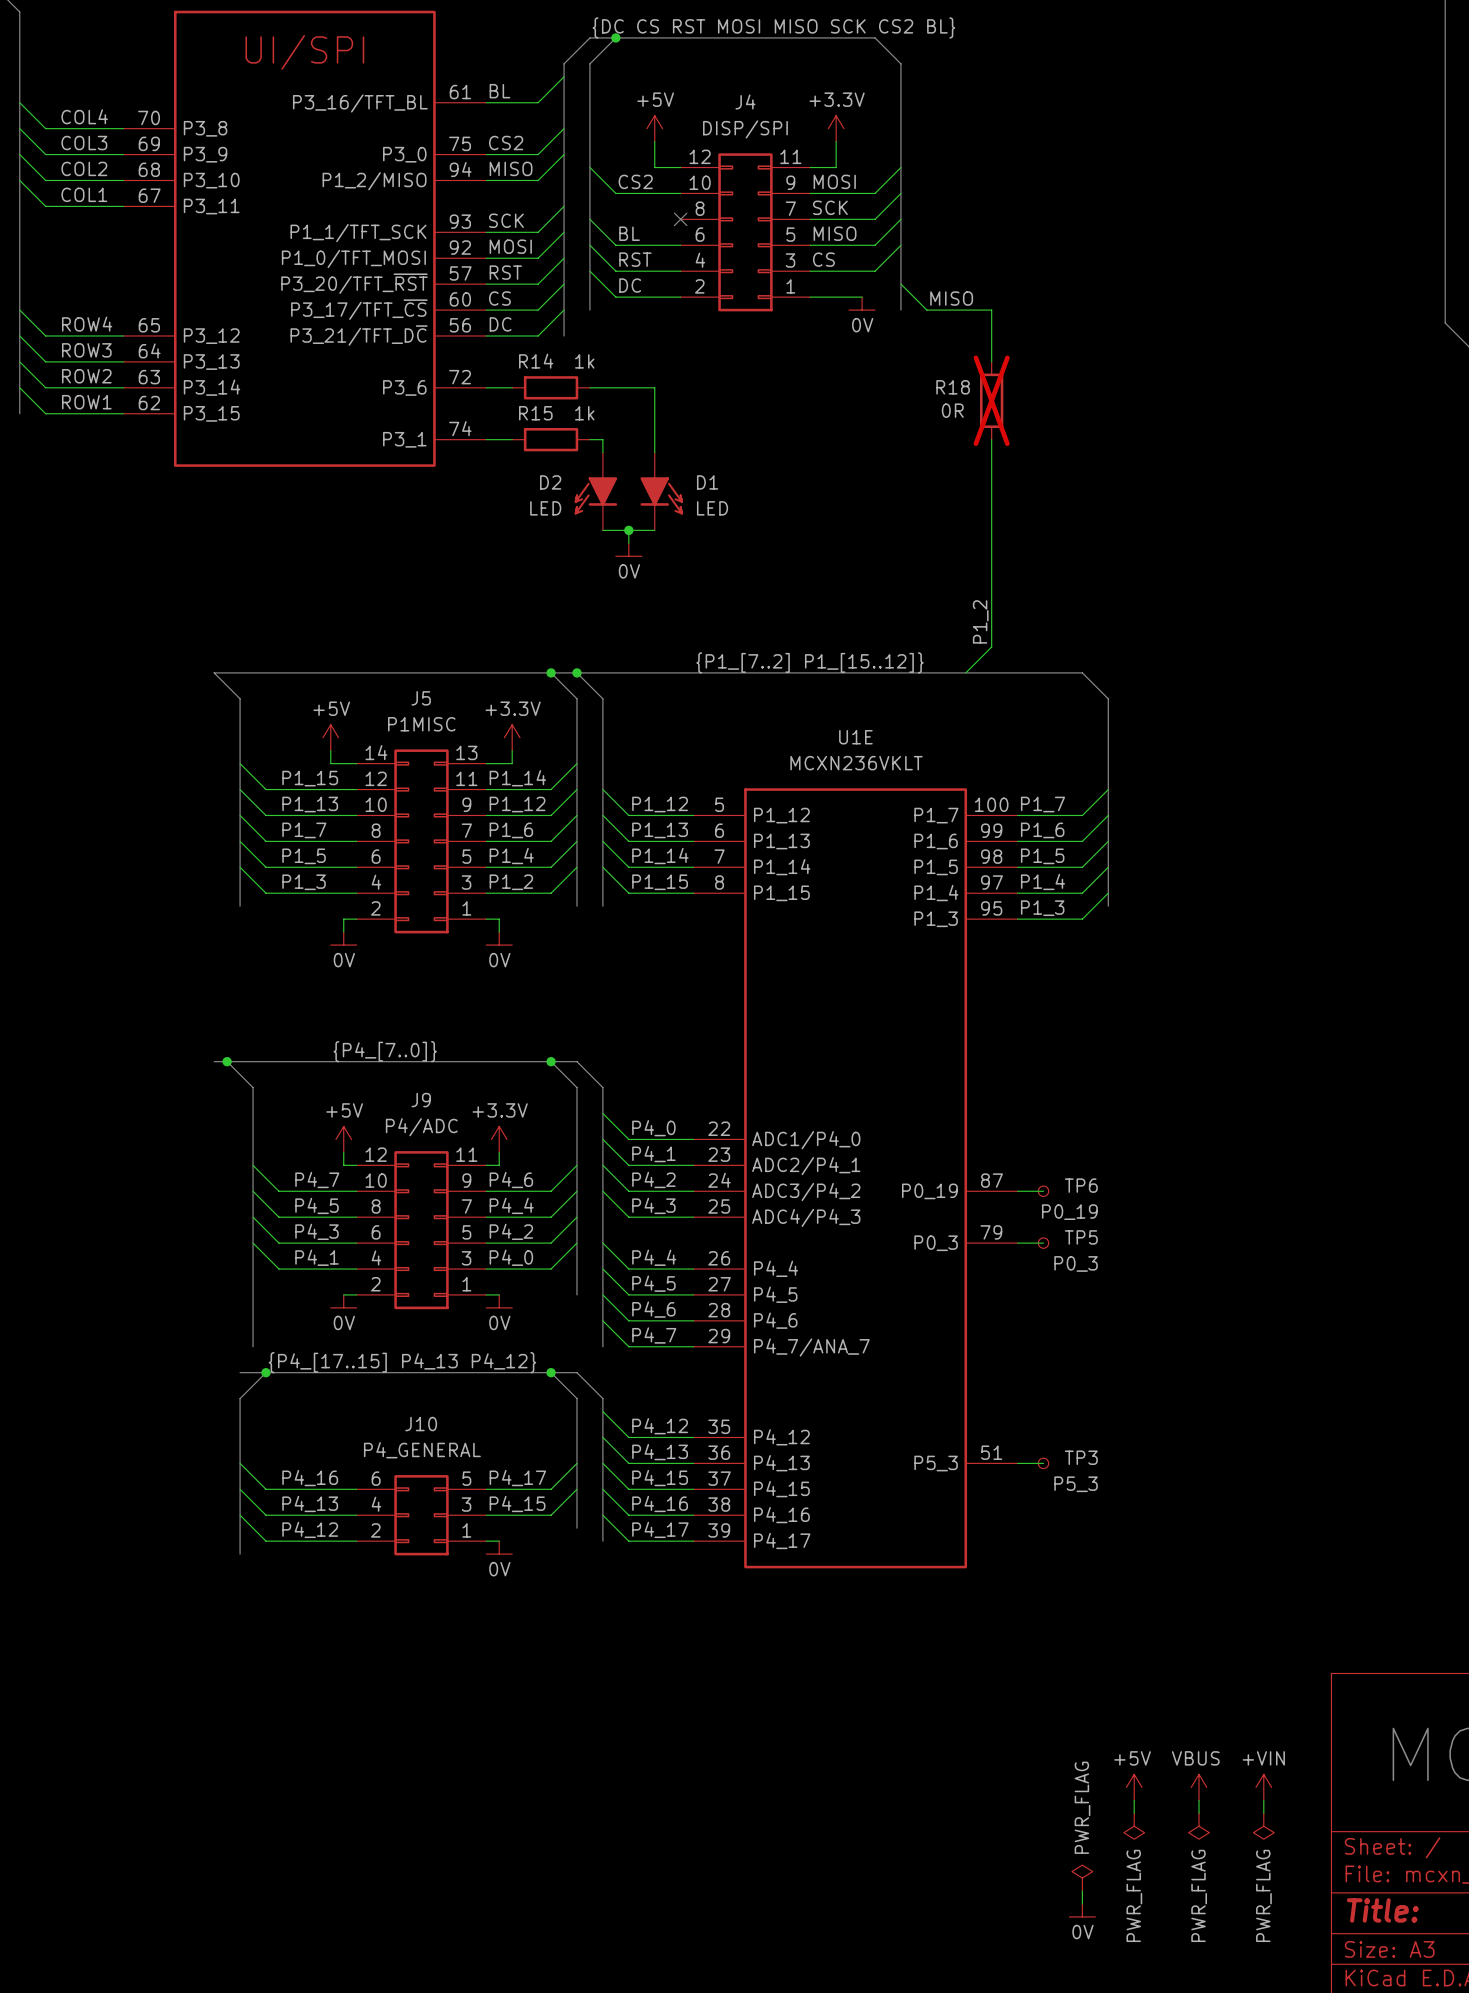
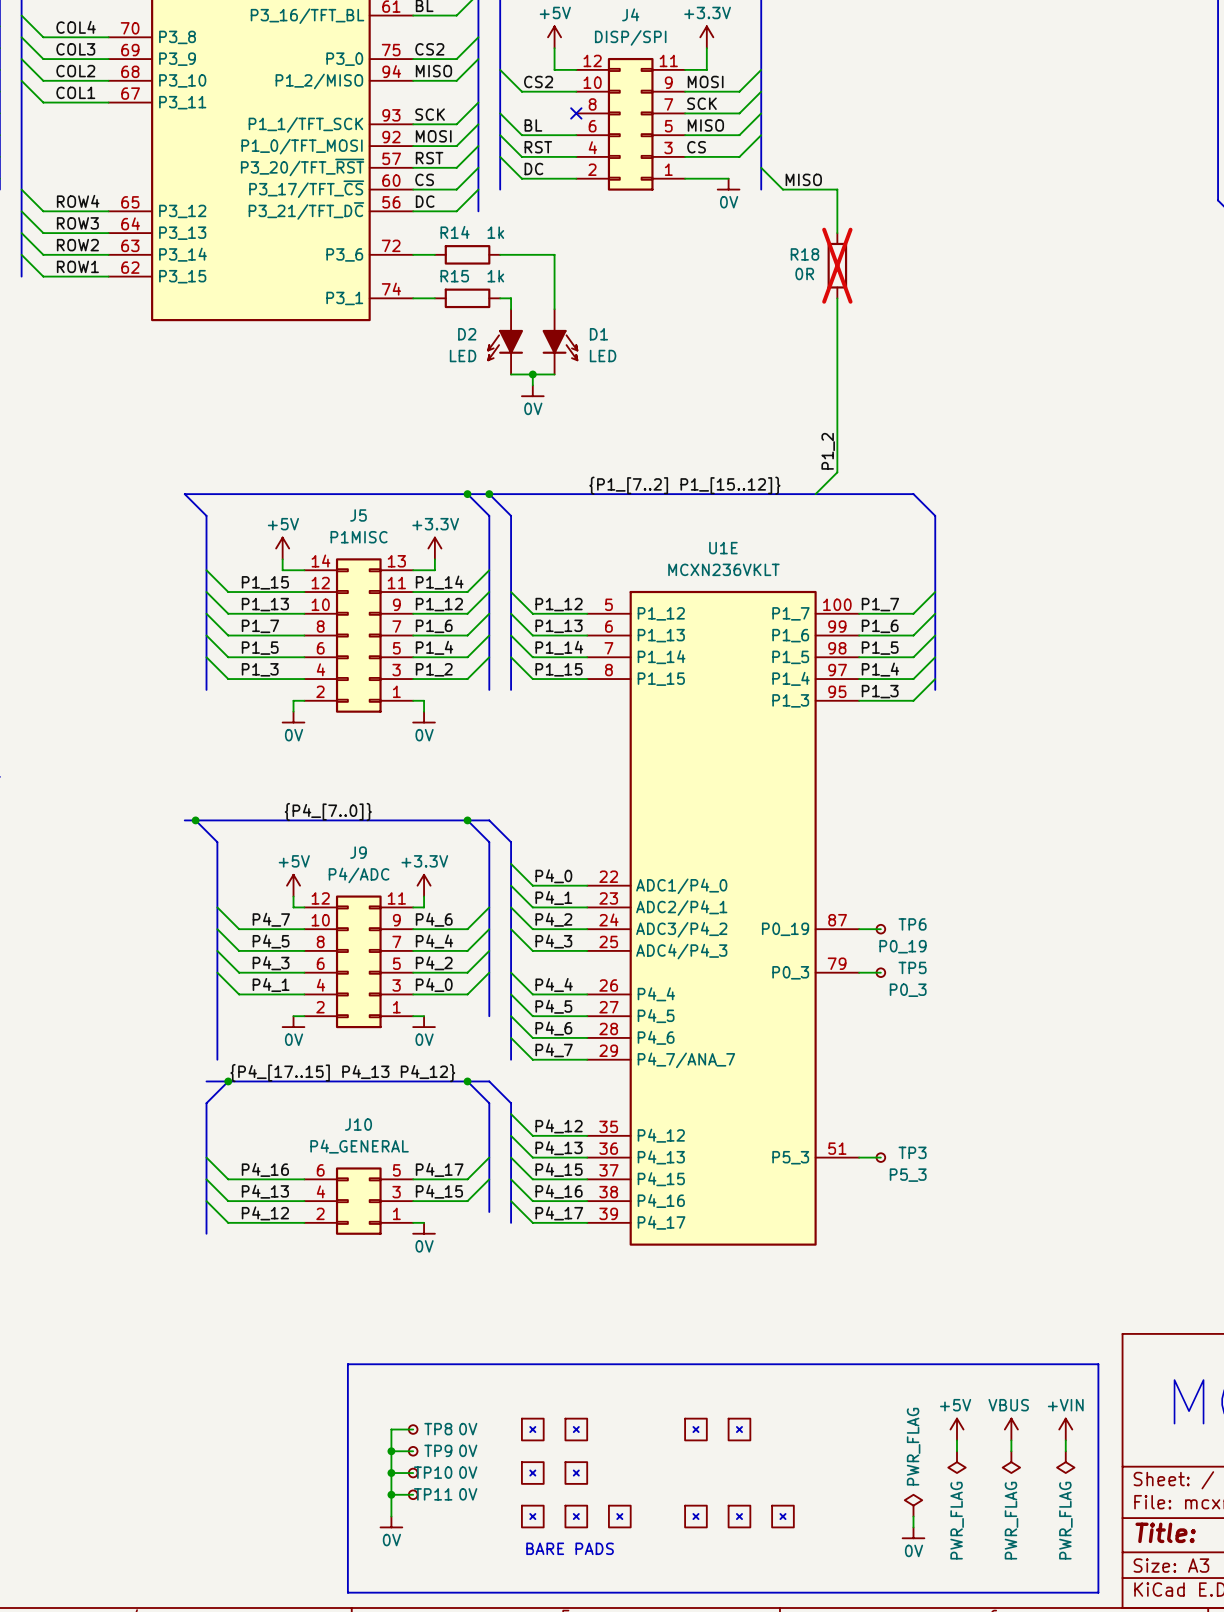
line: none -> (347, 1364) (1098, 1364) (1098, 1592) (347, 1592) (347, 1364)
wire: none -> (413, 1429) (391, 1429) (391, 1516)
TP8: none -> 0V (413, 1429)
part: none -> (532, 1429)
part: none -> (576, 1429)
part: none -> (695, 1429)
part: none -> (739, 1429)
wire: none -> (391, 1451) (413, 1451)
junction: none -> (391, 1451)
TP9: none -> 0V (413, 1451)
wire: none -> (391, 1473) (413, 1473)
junction: none -> (391, 1473)
TP10: none -> 0V (413, 1473)
part: none -> (532, 1473)
part: none -> (576, 1473)
wire: none -> (391, 1494) (413, 1494)
junction: none -> (391, 1494)
TP11: none -> 0V (413, 1494)
part: none -> (532, 1516)
part: none -> (576, 1516)
part: none -> (619, 1516)
part: none -> (695, 1516)
part: none -> (739, 1516)
part: none -> (782, 1516)
power symbol: none -> 0V (391, 1521)
text: none -> BARE PADS (570, 1548)

